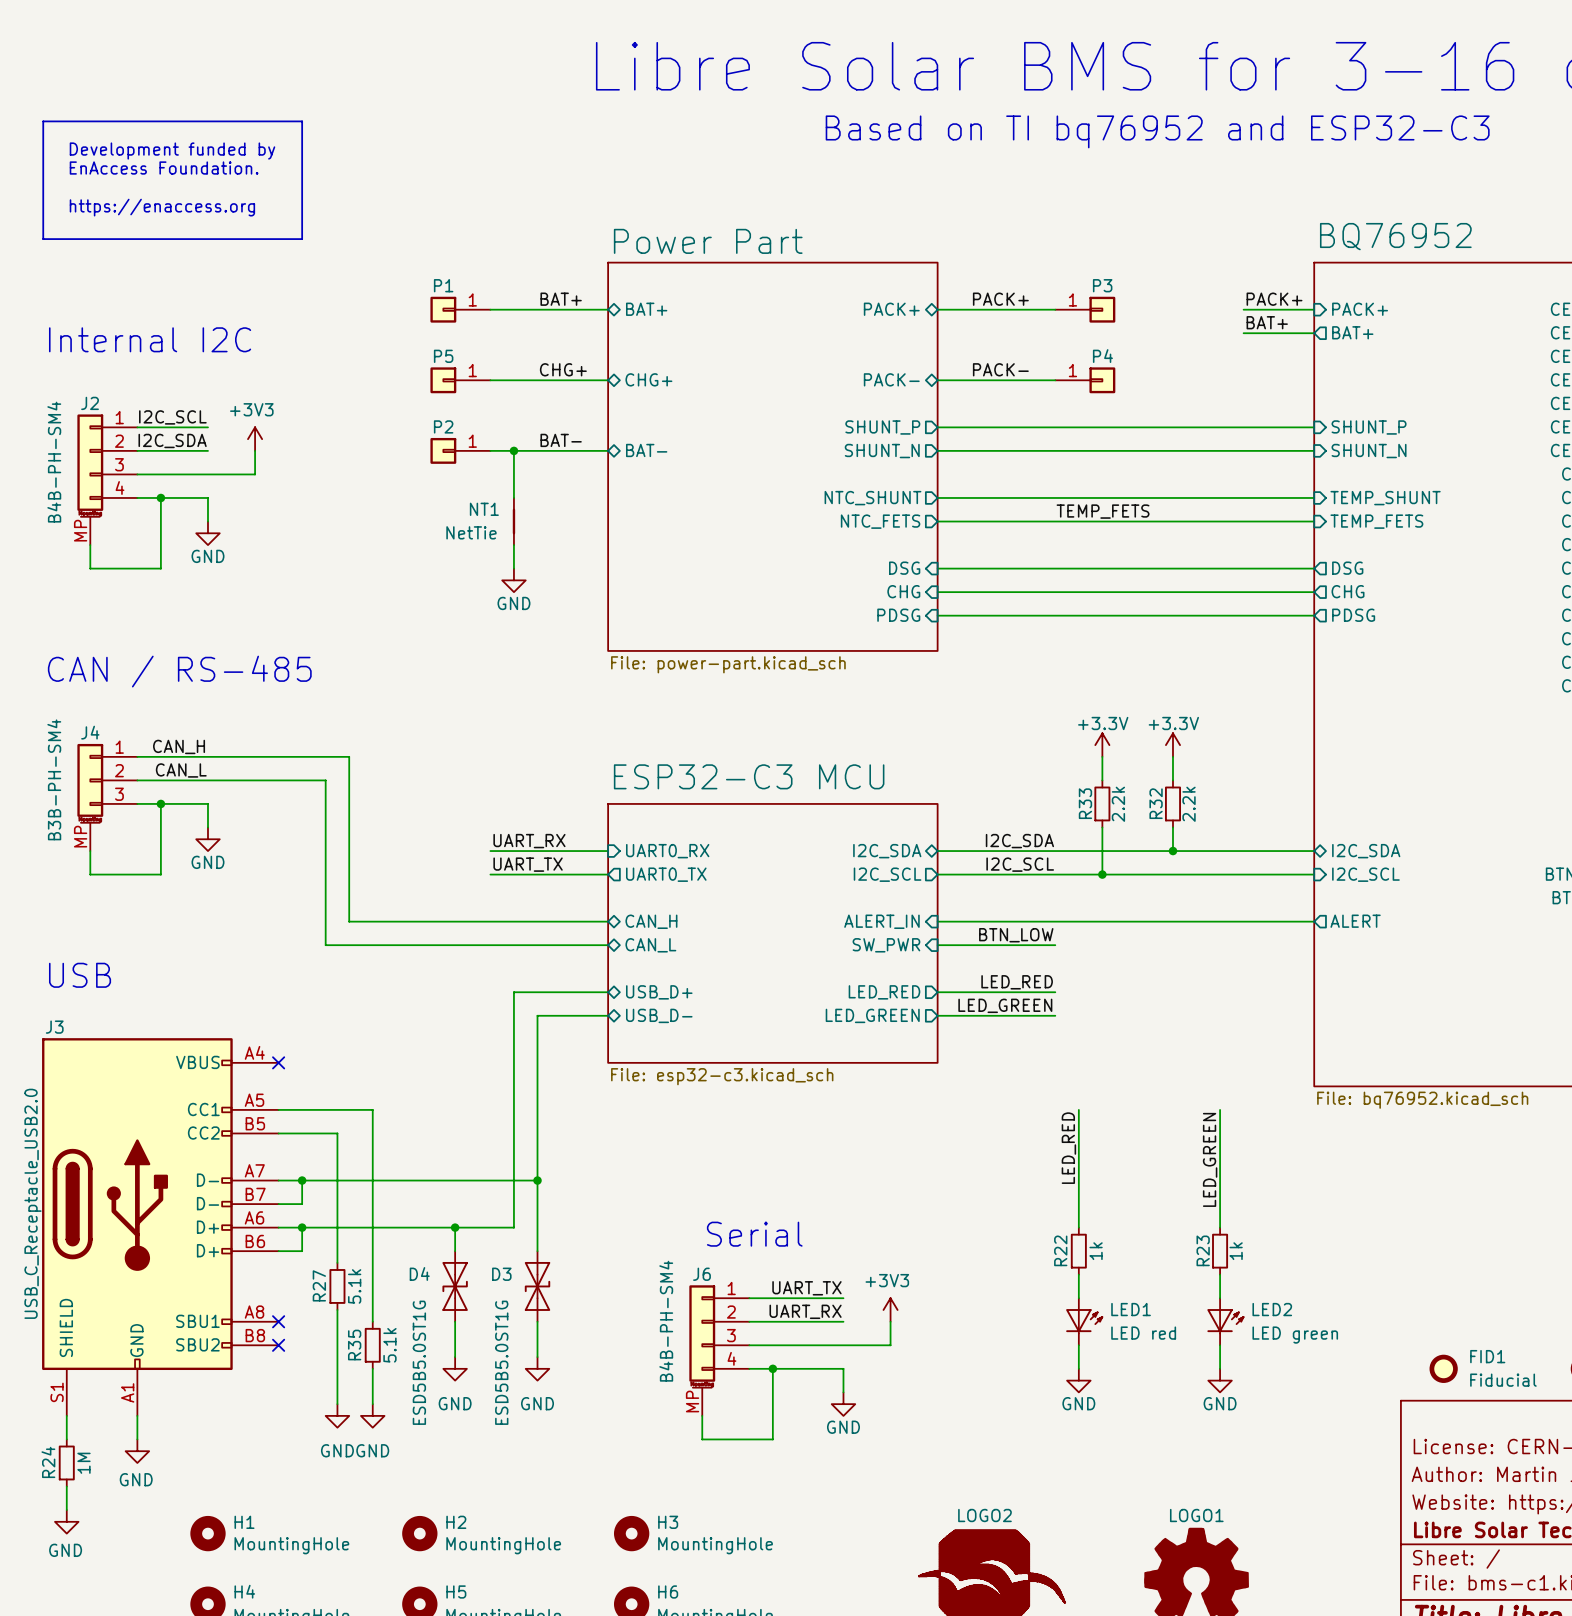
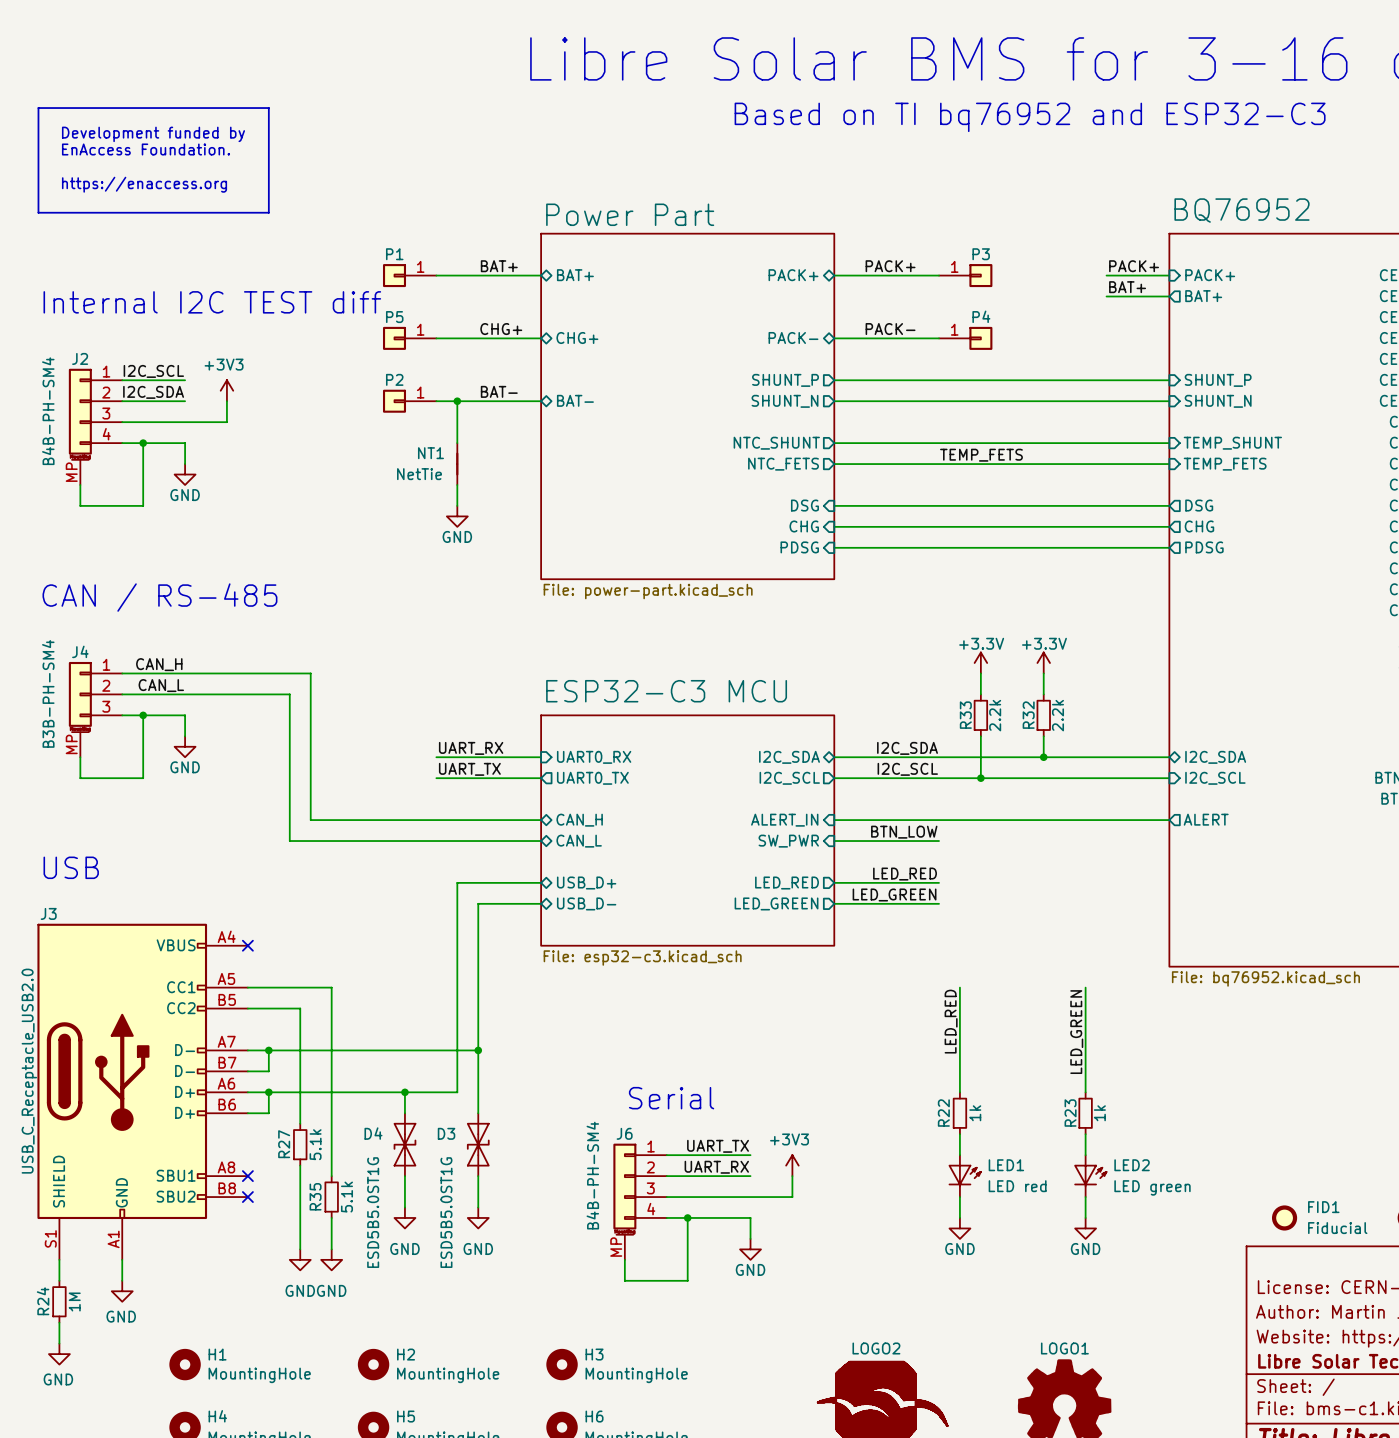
text: Internal I2C (150, 339) -> Internal I2C TEST diff (212, 302)

